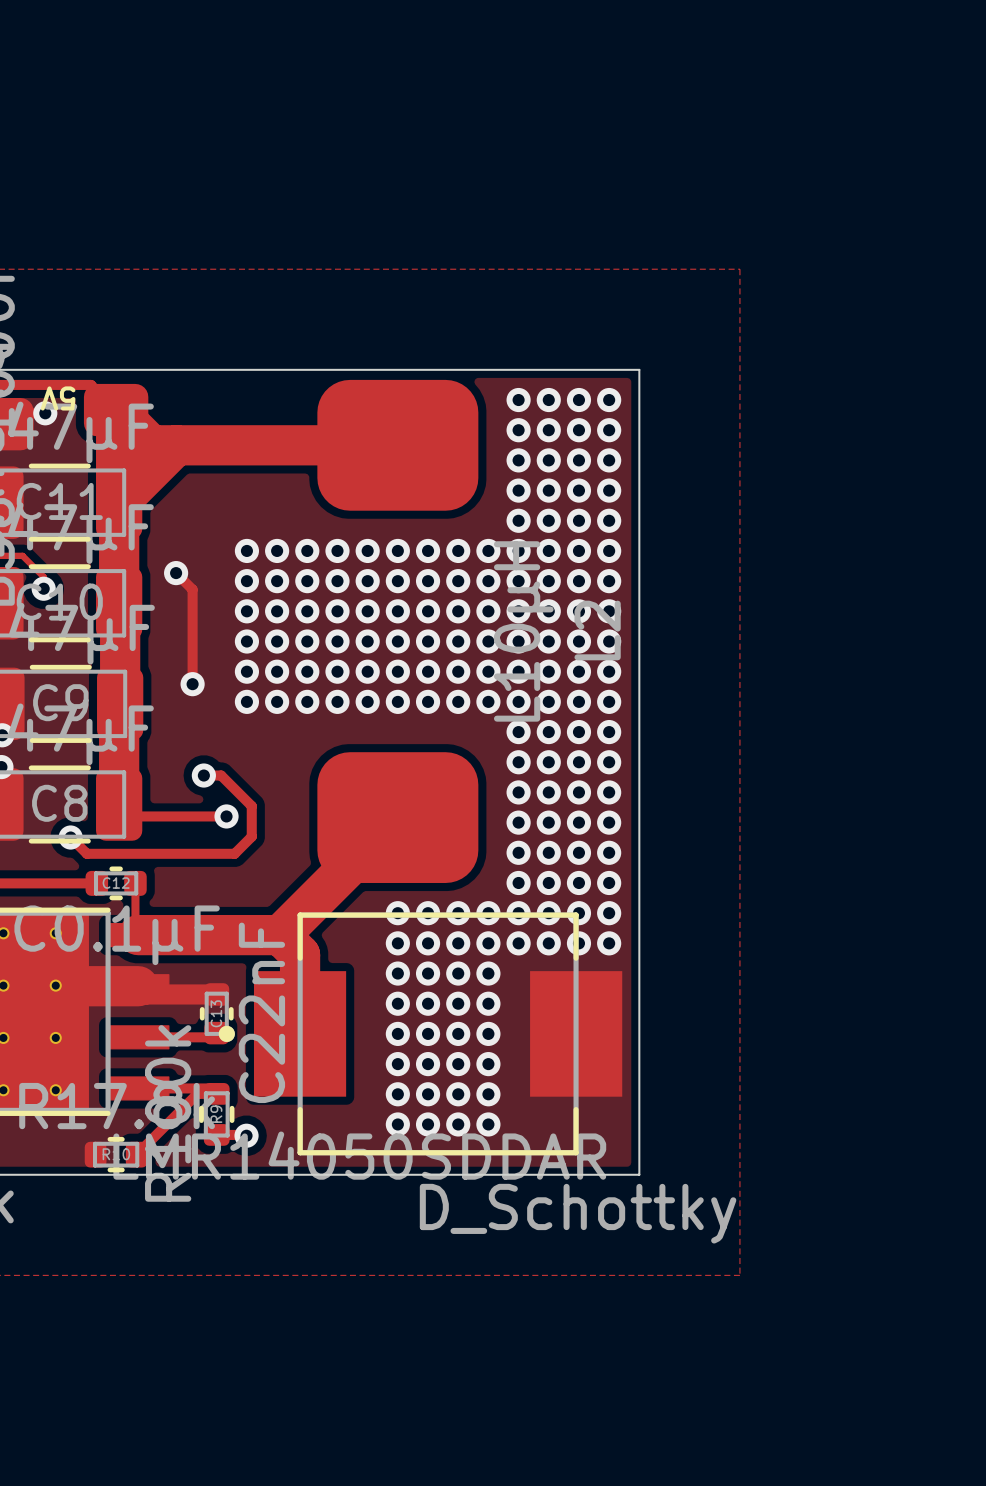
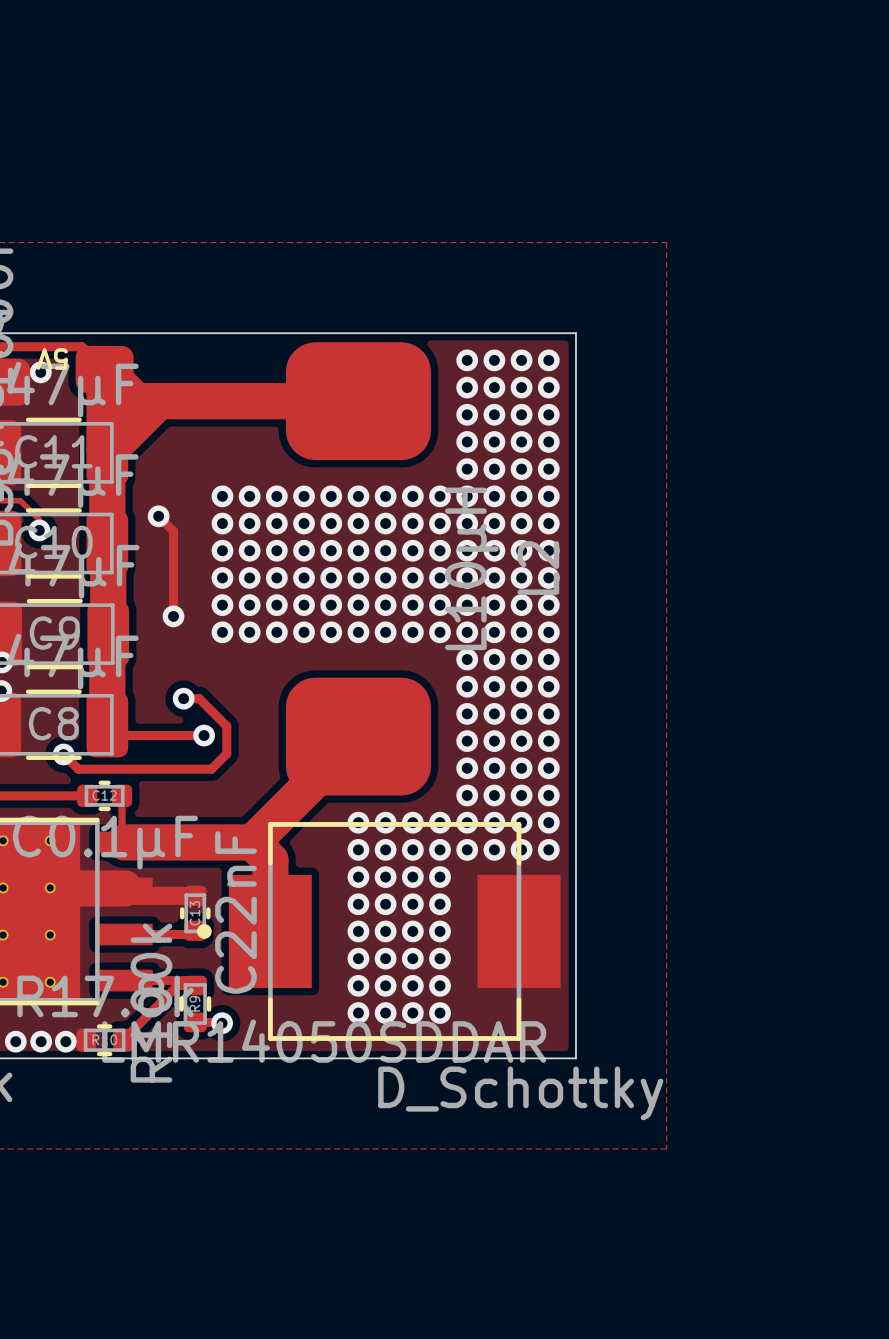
via: none -> (15, 1041)
via: none -> (41, 1041)
via: none -> (65, 1041)

